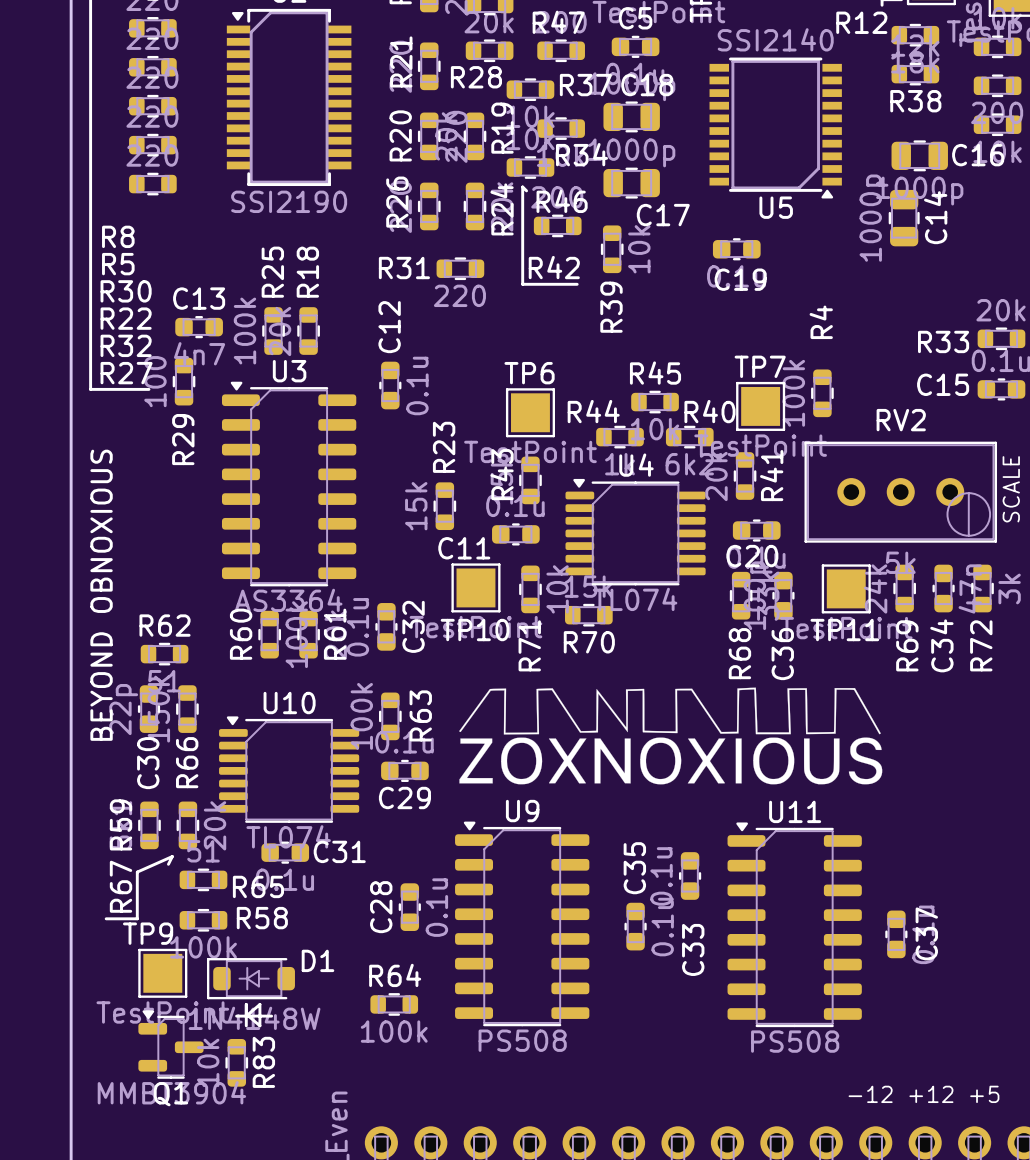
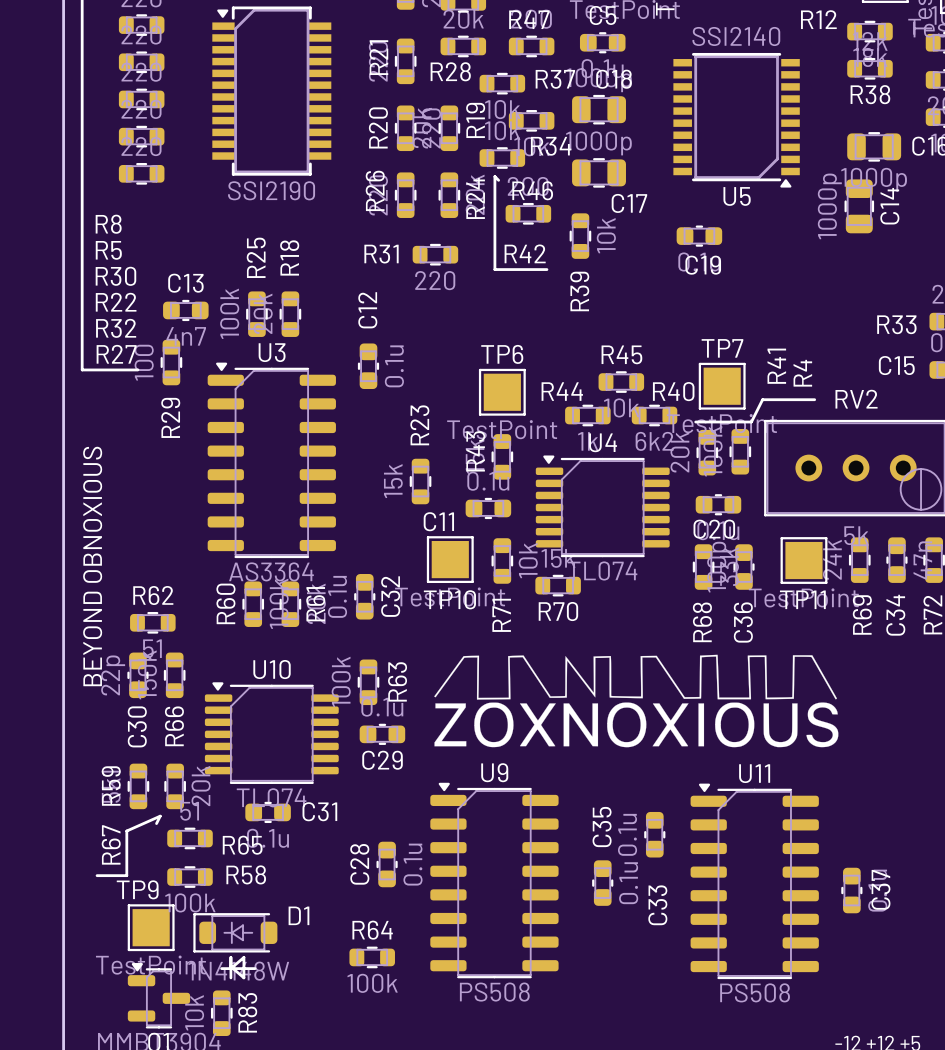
R4 name position: R4 (821, 322) -> R4 (802, 373)
R4 position: (822, 393) -> (740, 451)
line: none -> (814, 399) (762, 399) (751, 422) (695, 422)
R41 name position: R41 (771, 475) -> R41 (776, 366)

